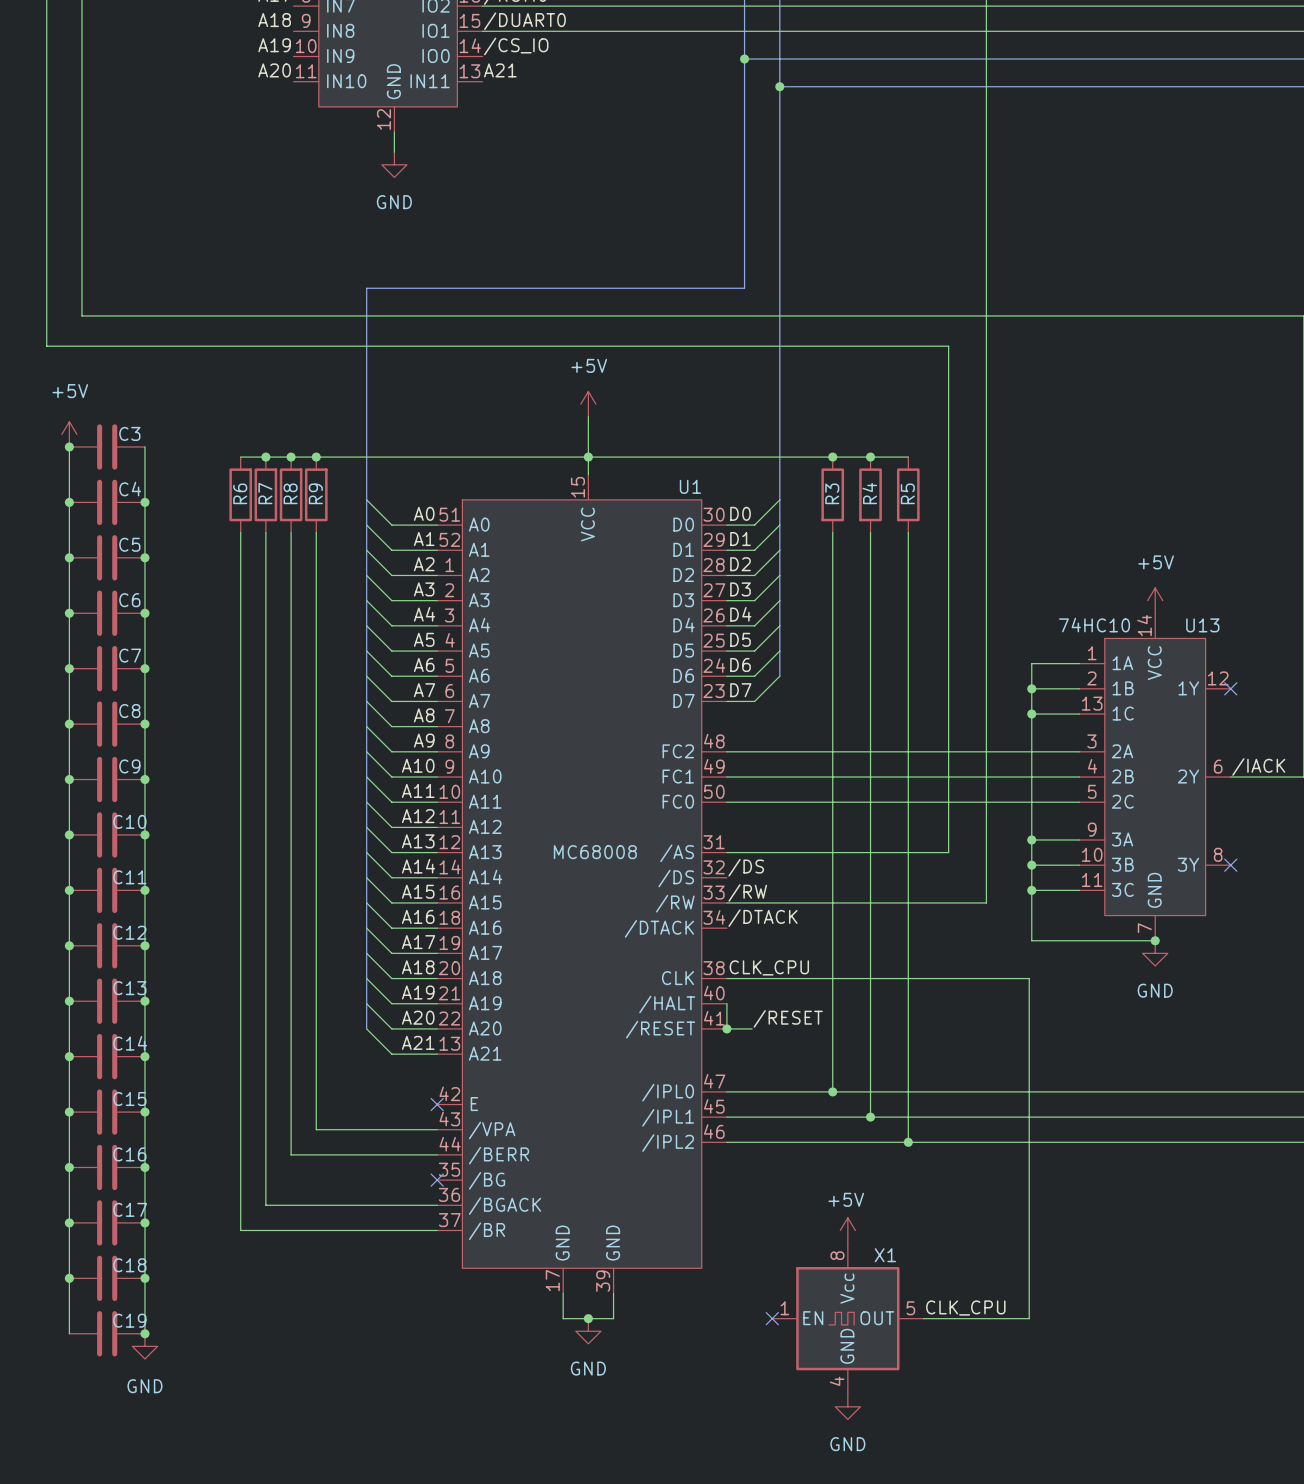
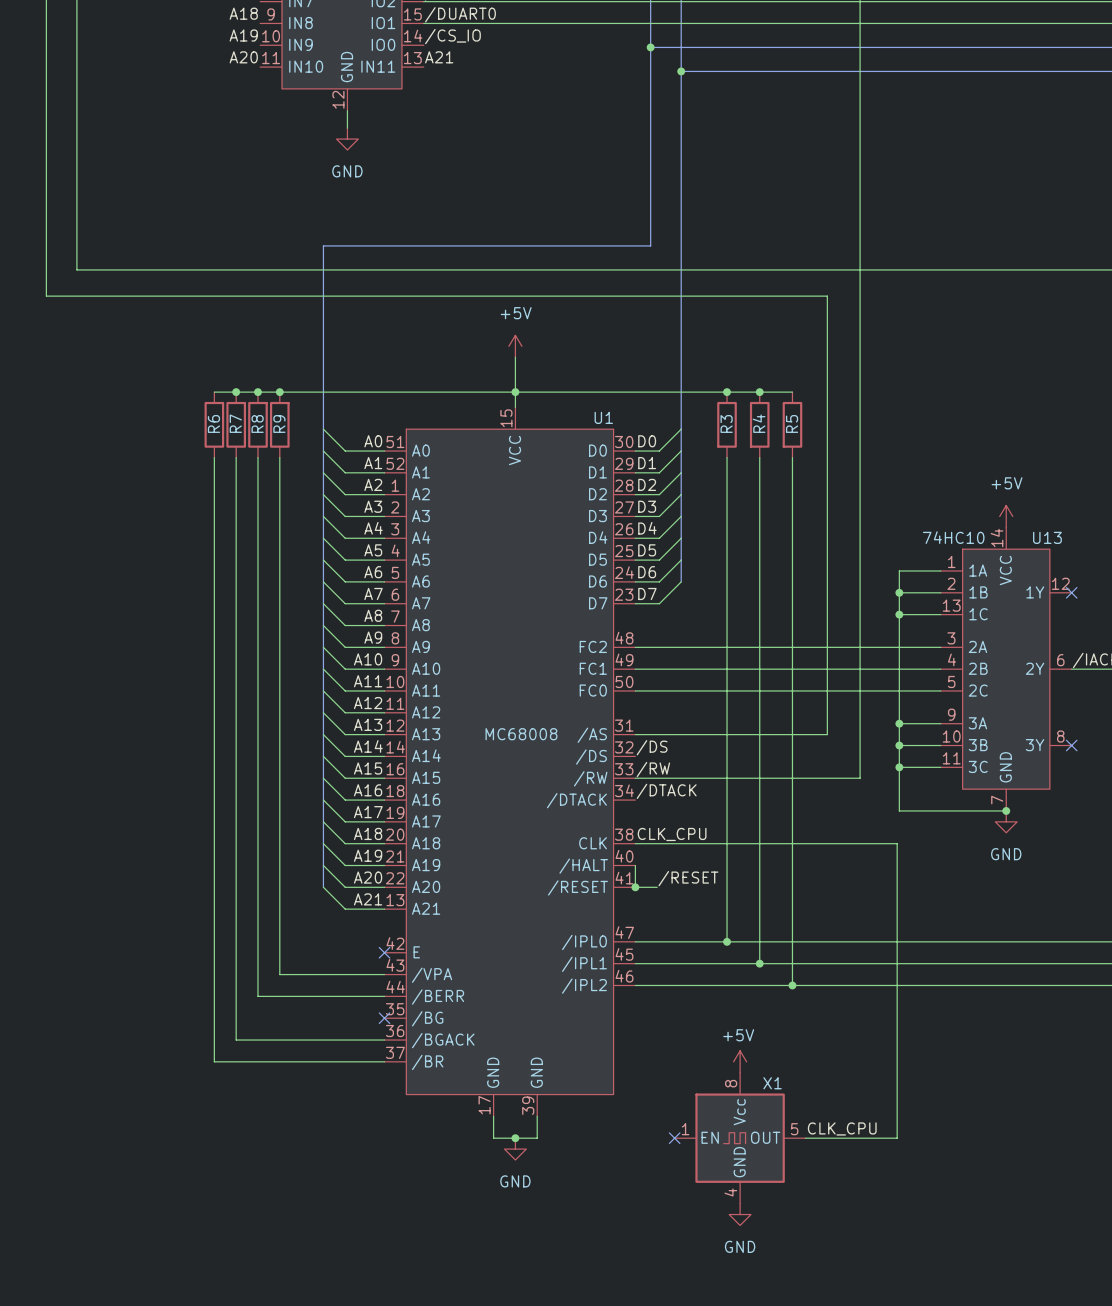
power symbol: +5V (69, 434) -> none
wire: (69, 446) (69, 1333) -> none
junction: (69, 446) -> none
C3: (107, 446) -> none
wire: (144, 446) (144, 1333) -> none
junction: (69, 502) -> none
C4: (107, 502) -> none
junction: (144, 502) -> none
junction: (69, 557) -> none
C5: (107, 557) -> none
junction: (144, 557) -> none
junction: (69, 613) -> none
C6: (107, 613) -> none
junction: (144, 613) -> none
junction: (69, 668) -> none
C7: (107, 668) -> none
junction: (144, 668) -> none
junction: (69, 724) -> none
C8: (107, 724) -> none
junction: (144, 724) -> none
junction: (69, 779) -> none
C9: (107, 779) -> none
junction: (144, 779) -> none
junction: (69, 834) -> none
C10: (107, 834) -> none
junction: (144, 834) -> none
junction: (69, 890) -> none
C11: (107, 890) -> none
junction: (144, 890) -> none
junction: (69, 945) -> none
C12: (107, 945) -> none
junction: (144, 945) -> none
junction: (69, 1001) -> none
C13: (107, 1001) -> none
junction: (144, 1001) -> none
junction: (69, 1056) -> none
C14: (107, 1056) -> none
junction: (144, 1056) -> none
junction: (69, 1112) -> none
C15: (107, 1112) -> none
junction: (144, 1112) -> none
junction: (69, 1167) -> none
C16: (107, 1167) -> none
junction: (144, 1167) -> none
junction: (69, 1222) -> none
C17: (107, 1222) -> none
junction: (144, 1222) -> none
junction: (69, 1278) -> none
C18: (107, 1278) -> none
junction: (144, 1278) -> none
C19: (107, 1333) -> none
junction: (144, 1333) -> none
power symbol: GND (144, 1346) -> none

